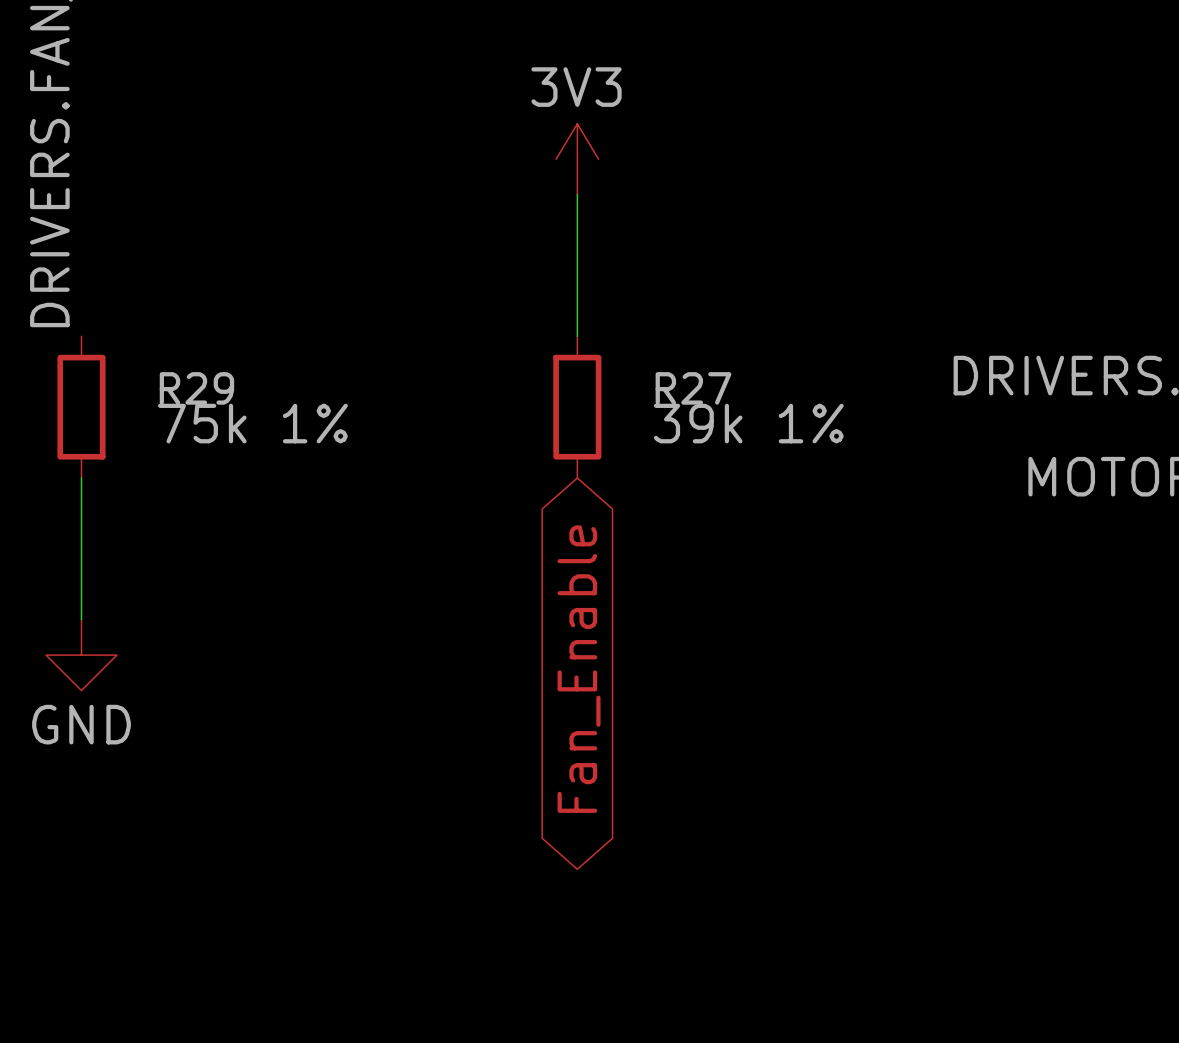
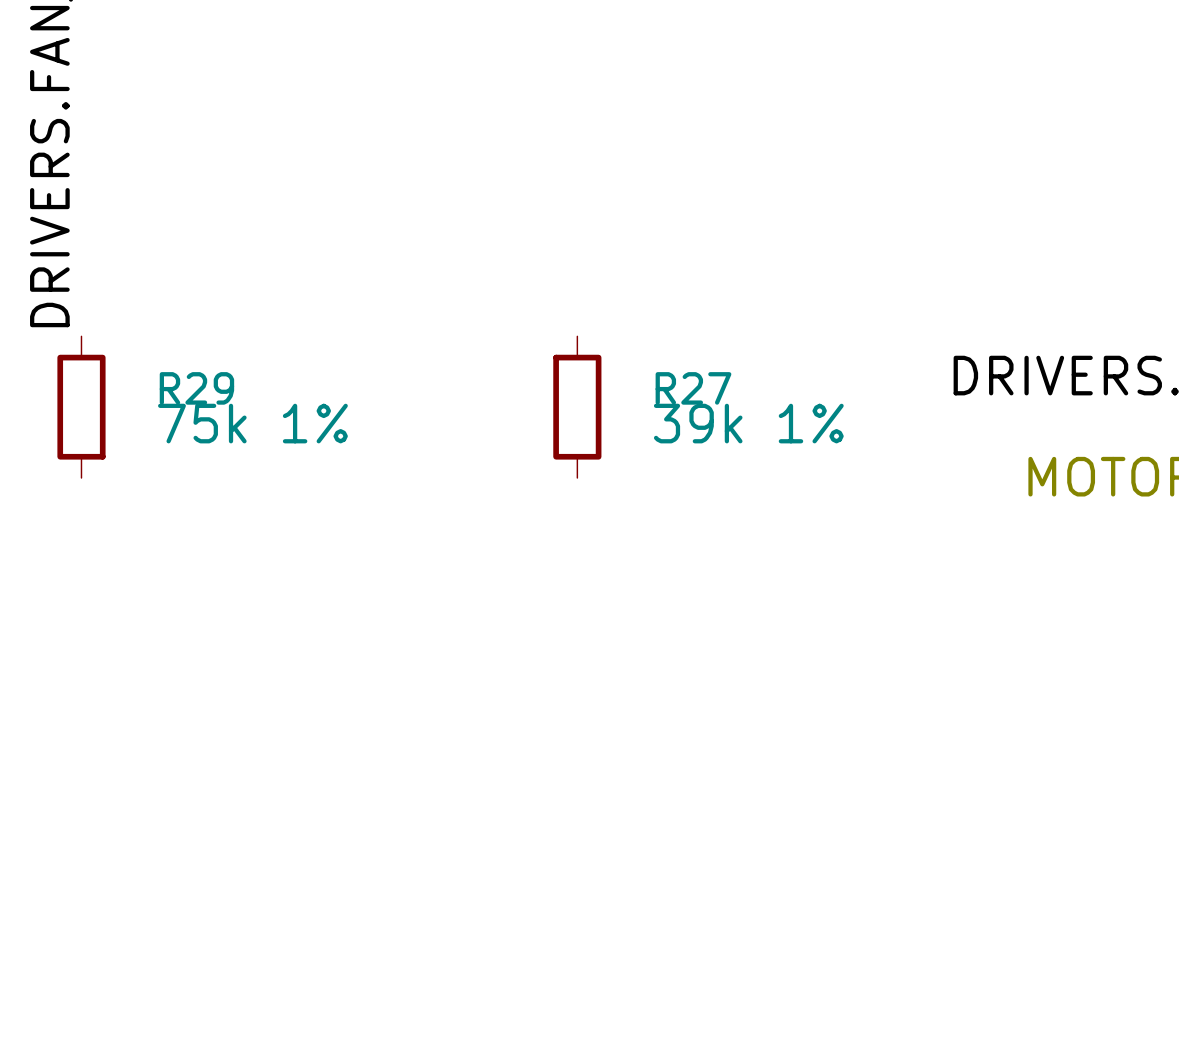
power symbol: 3V3 (577, 159) -> none
wire: (577, 194) (577, 336) -> none
wire: (81, 478) (81, 619) -> none
power symbol: GND (81, 655) -> none
global label: Fan_Enable (579, 669) -> none

